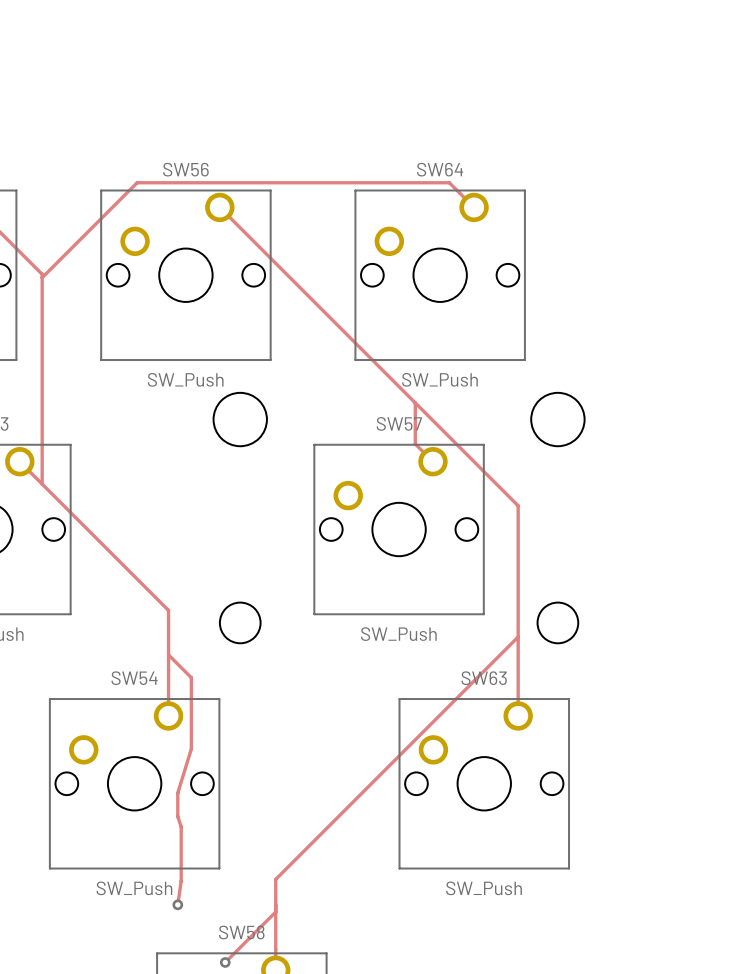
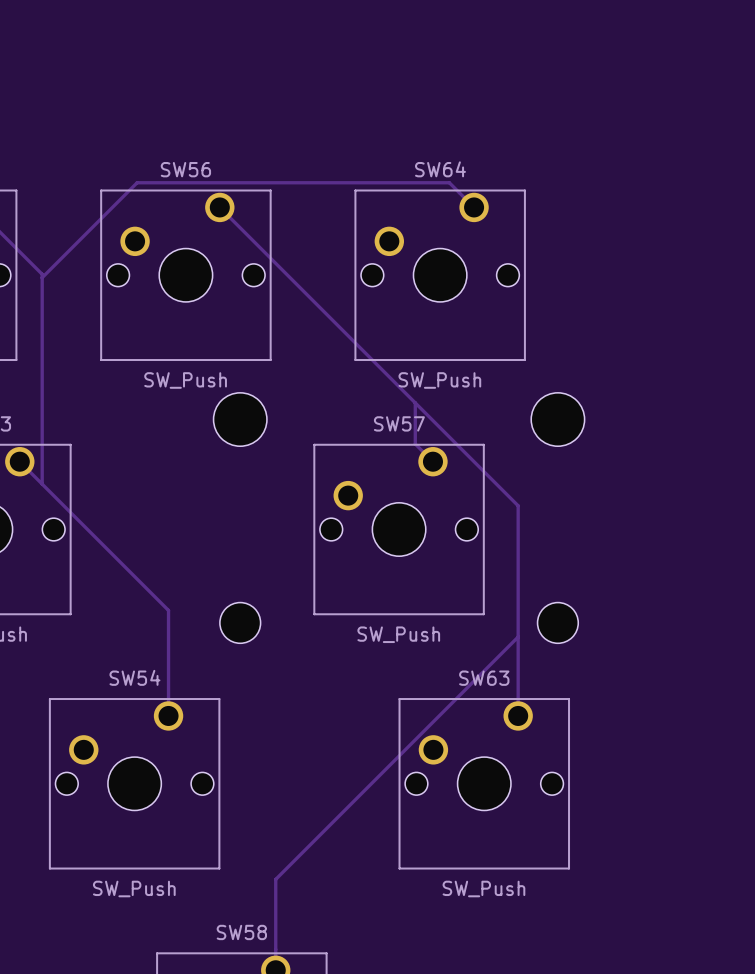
track: (168, 654) (191, 677) (191, 748) (177, 792) (177, 816) (181, 826) (181, 881) (177, 904) -> none
via: (177, 904) -> none
track: (275, 911) (225, 962) -> none
via: (225, 962) -> none

